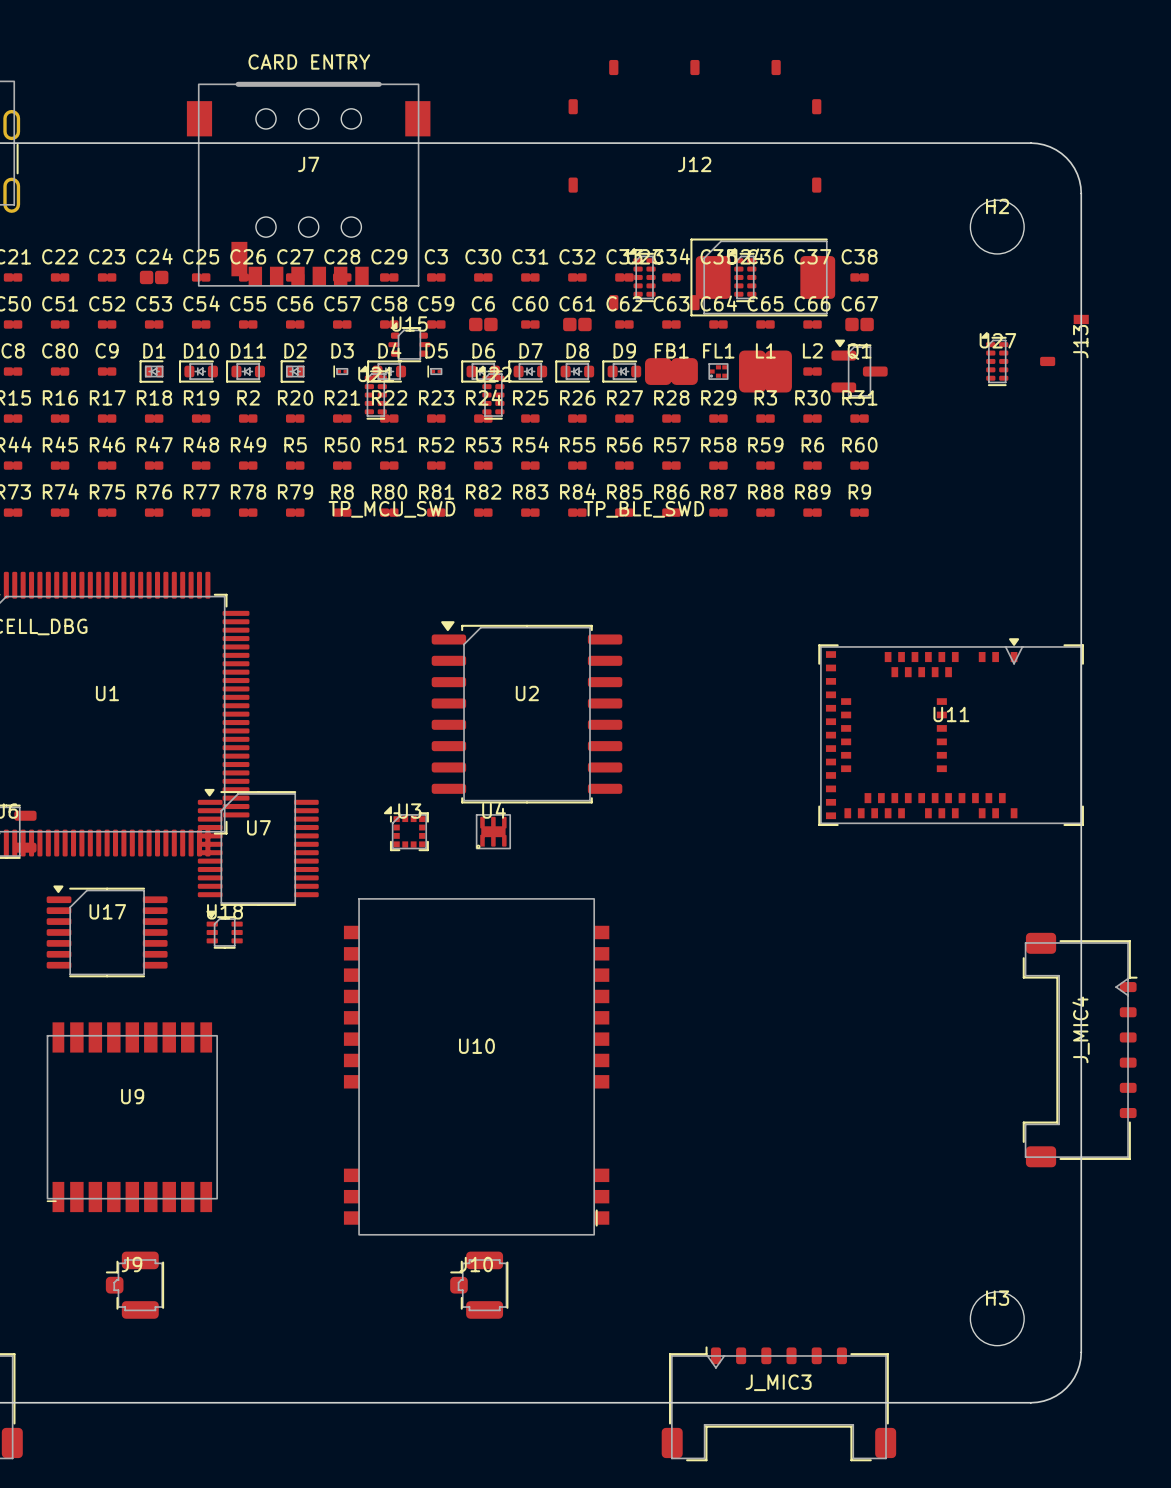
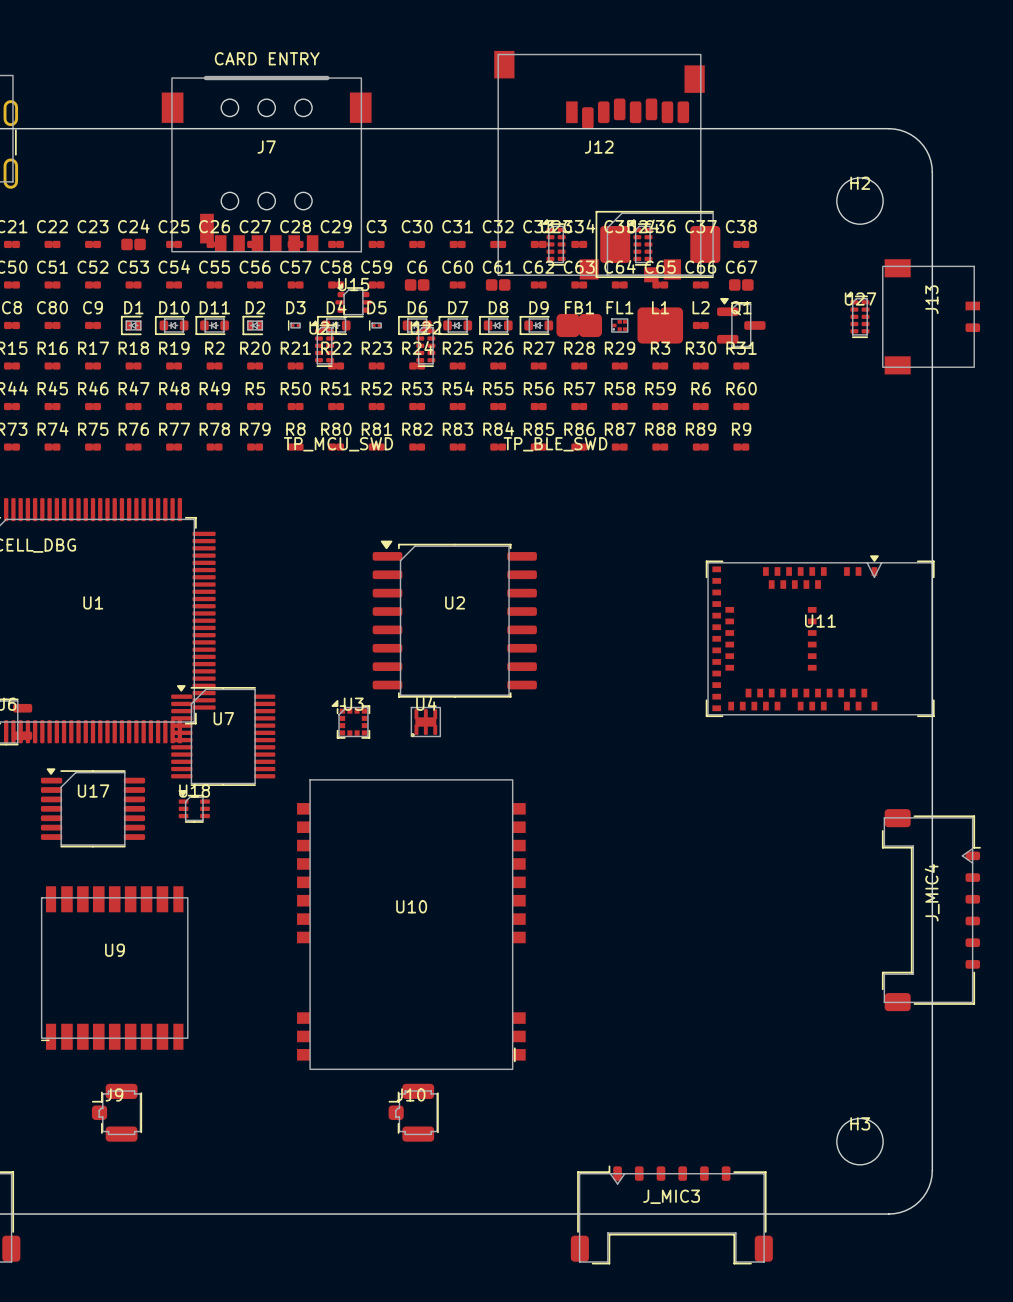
J12 footprint: [568, 59, 822, 311] -> [494, 50, 705, 283]
J13 footprint: [1040, 314, 1089, 367] -> [882, 259, 981, 375]

